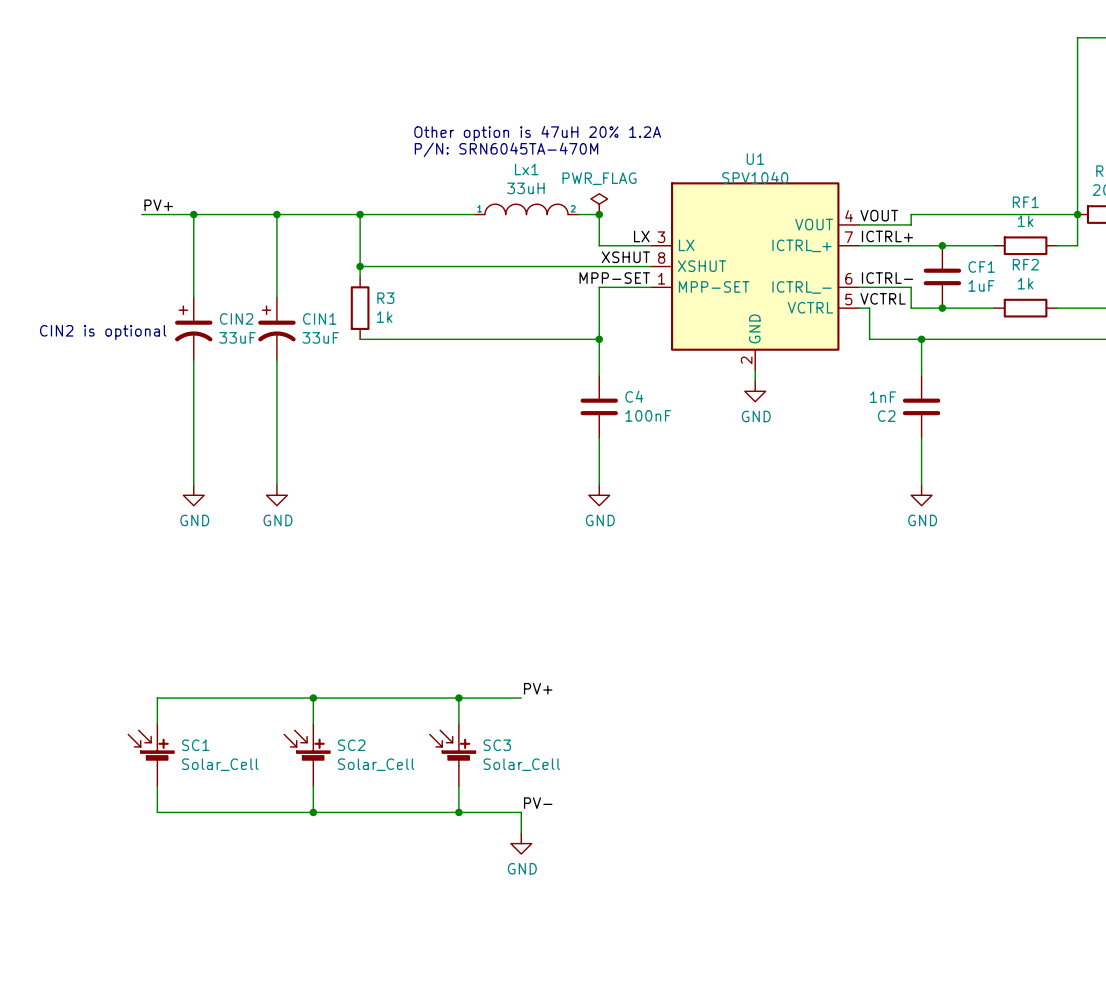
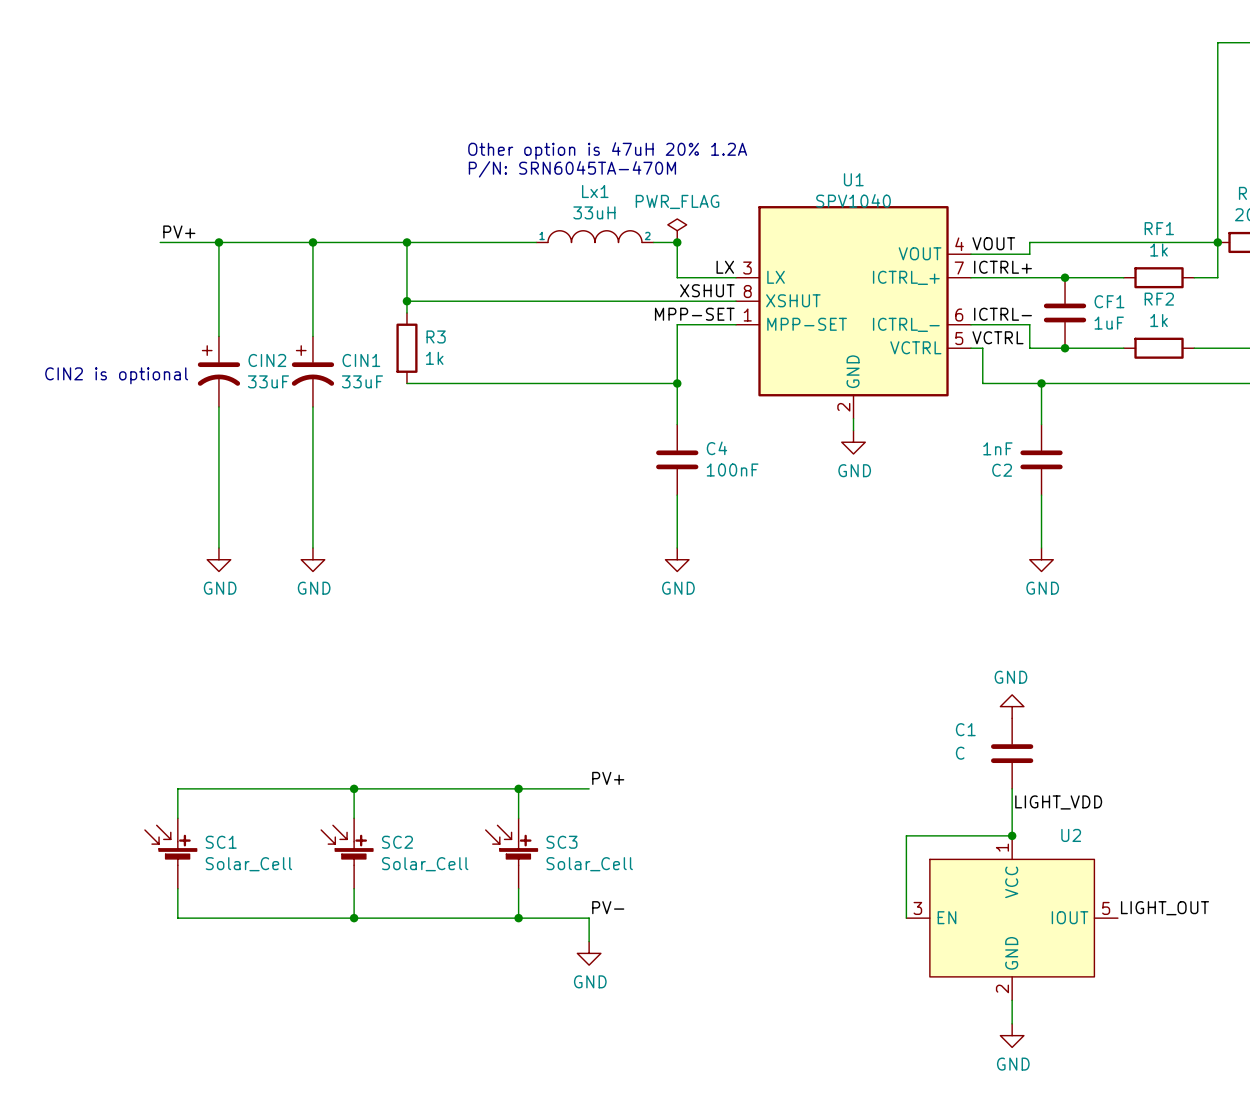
power symbol: none -> GND (1012, 706)
C1: none -> C (1012, 753)
wire: none -> (1012, 788) (1012, 835) (906, 835) (906, 918)
label: none -> LIGHT_VDD (1058, 802)
junction: none -> (1012, 835)
label: none -> LIGHT_OUT (1164, 908)
U2: none -> (1012, 918)
wire: none -> (1012, 1000) (1012, 1023)
power symbol: none -> GND (1012, 1035)

